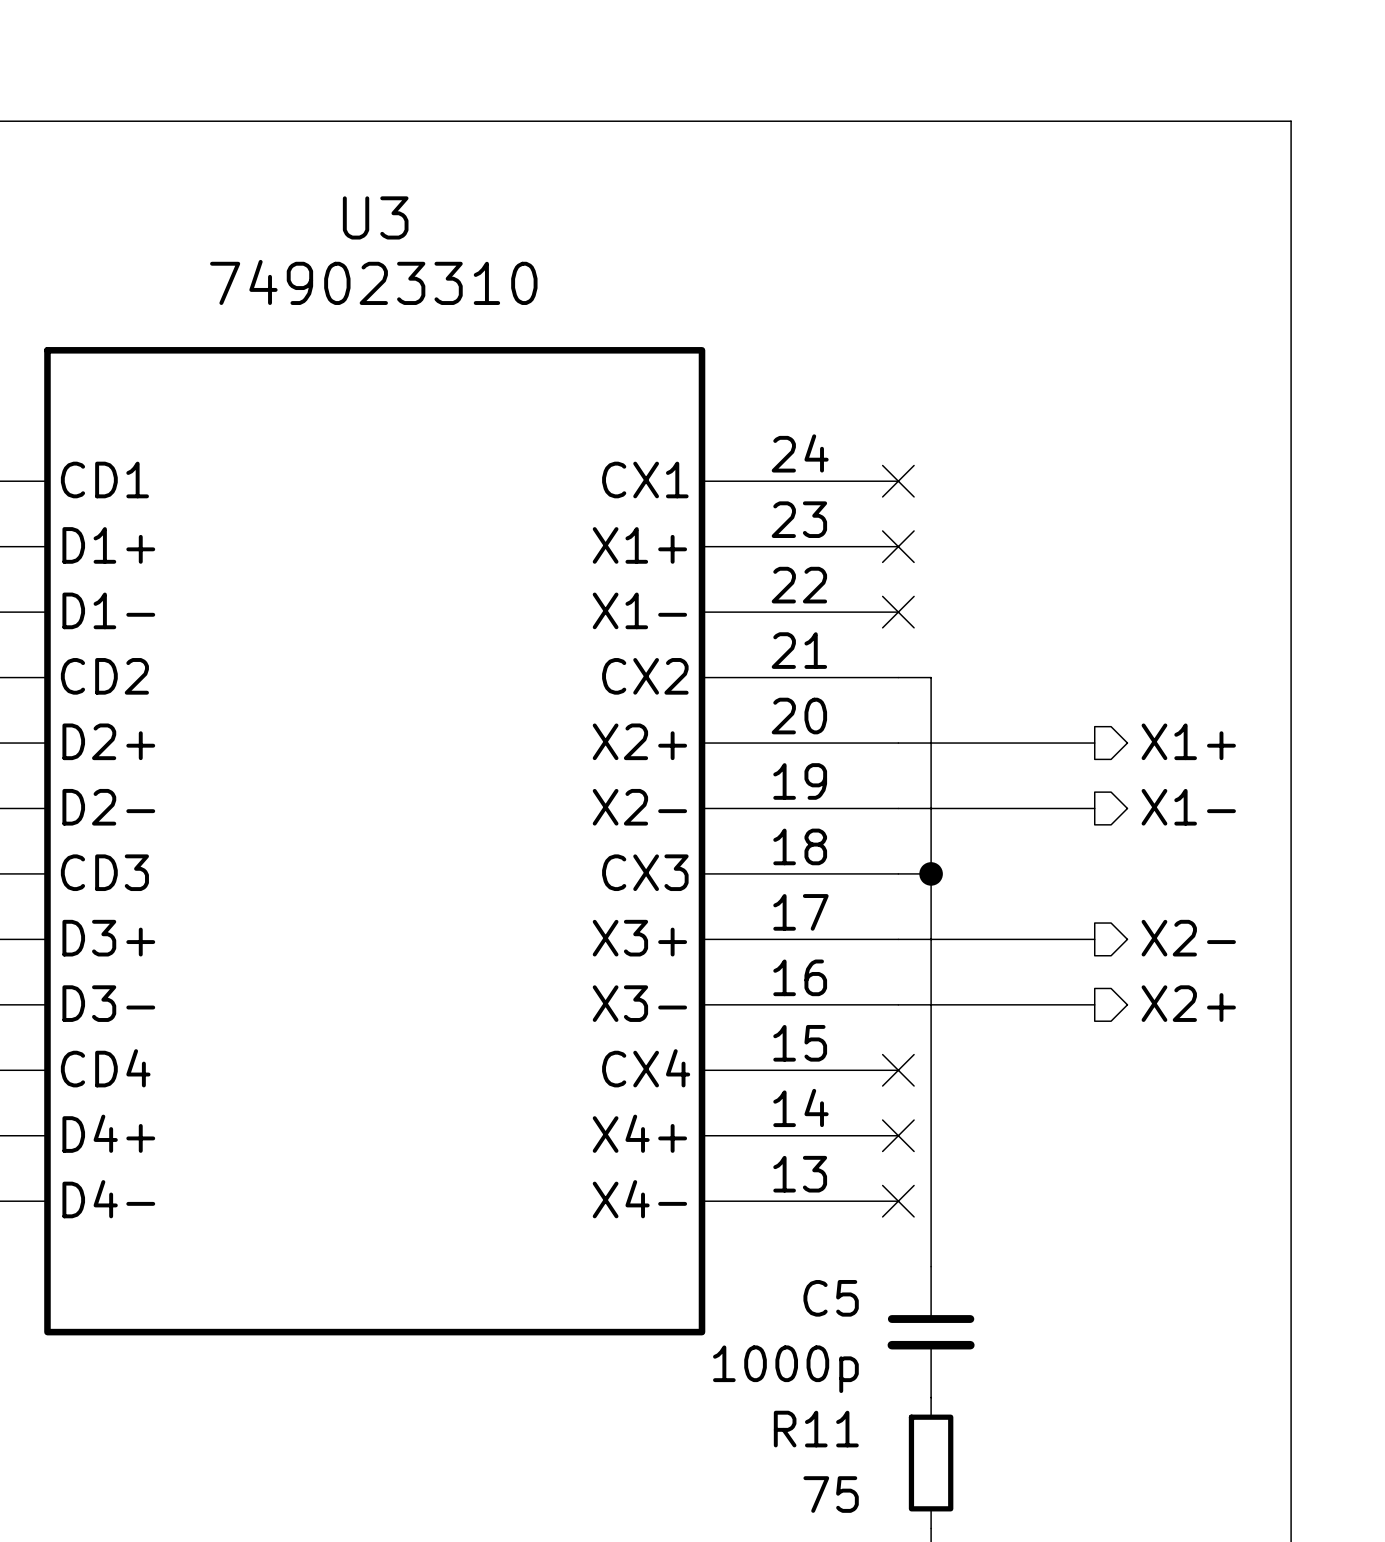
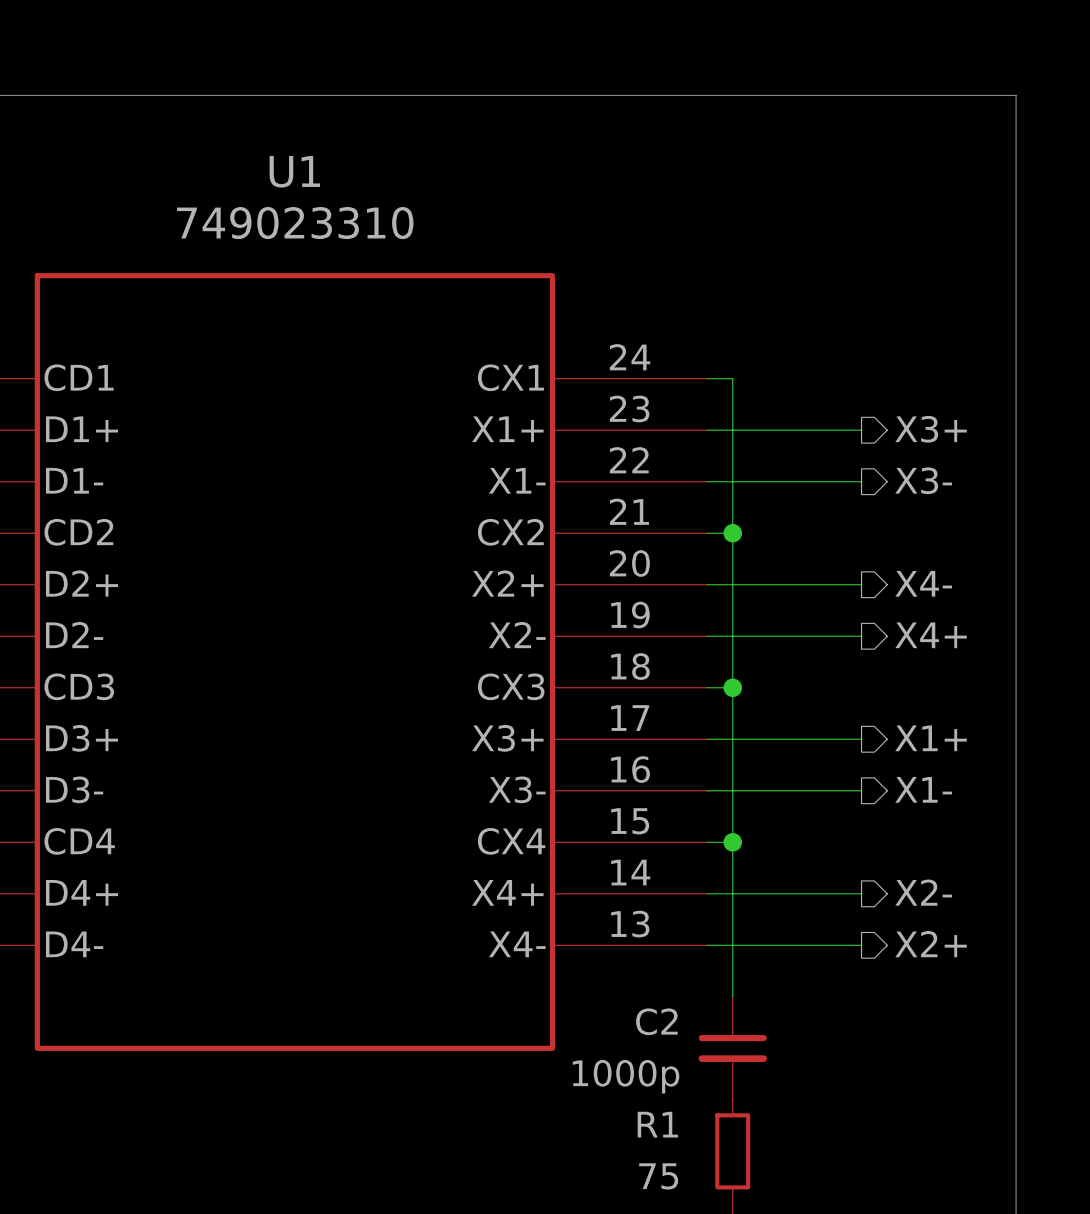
U3 name: U3 (375, 217) -> U1 (294, 171)
wire: none -> (707, 378) (732, 378) (732, 533)
no-connect mark: (898, 481) -> none
hierarchical label: none -> X3+ (931, 429)
wire: none -> (707, 430) (861, 430)
no-connect mark: (898, 546) -> none
hierarchical label: none -> X3- (923, 480)
wire: none -> (707, 481) (861, 481)
no-connect mark: (898, 612) -> none
junction: none -> (732, 533)
hierarchical label: X1+ (1188, 741) -> X4- (923, 583)
hierarchical label: X1- (1188, 807) -> X4+ (931, 635)
hierarchical label: X2- (1188, 938) -> X1+ (931, 738)
hierarchical label: X2+ (1188, 1003) -> X1- (923, 789)
wire: none -> (707, 842) (732, 842)
no-connect mark: (898, 1070) -> none
junction: none -> (732, 842)
hierarchical label: none -> X2- (923, 892)
wire: none -> (707, 893) (861, 893)
no-connect mark: (898, 1135) -> none
hierarchical label: none -> X2+ (931, 944)
wire: none -> (707, 945) (861, 945)
no-connect mark: (898, 1201) -> none
C5 name: C5 (831, 1298) -> C2 (656, 1021)
R11 name: R11 (816, 1429) -> R1 (657, 1124)

